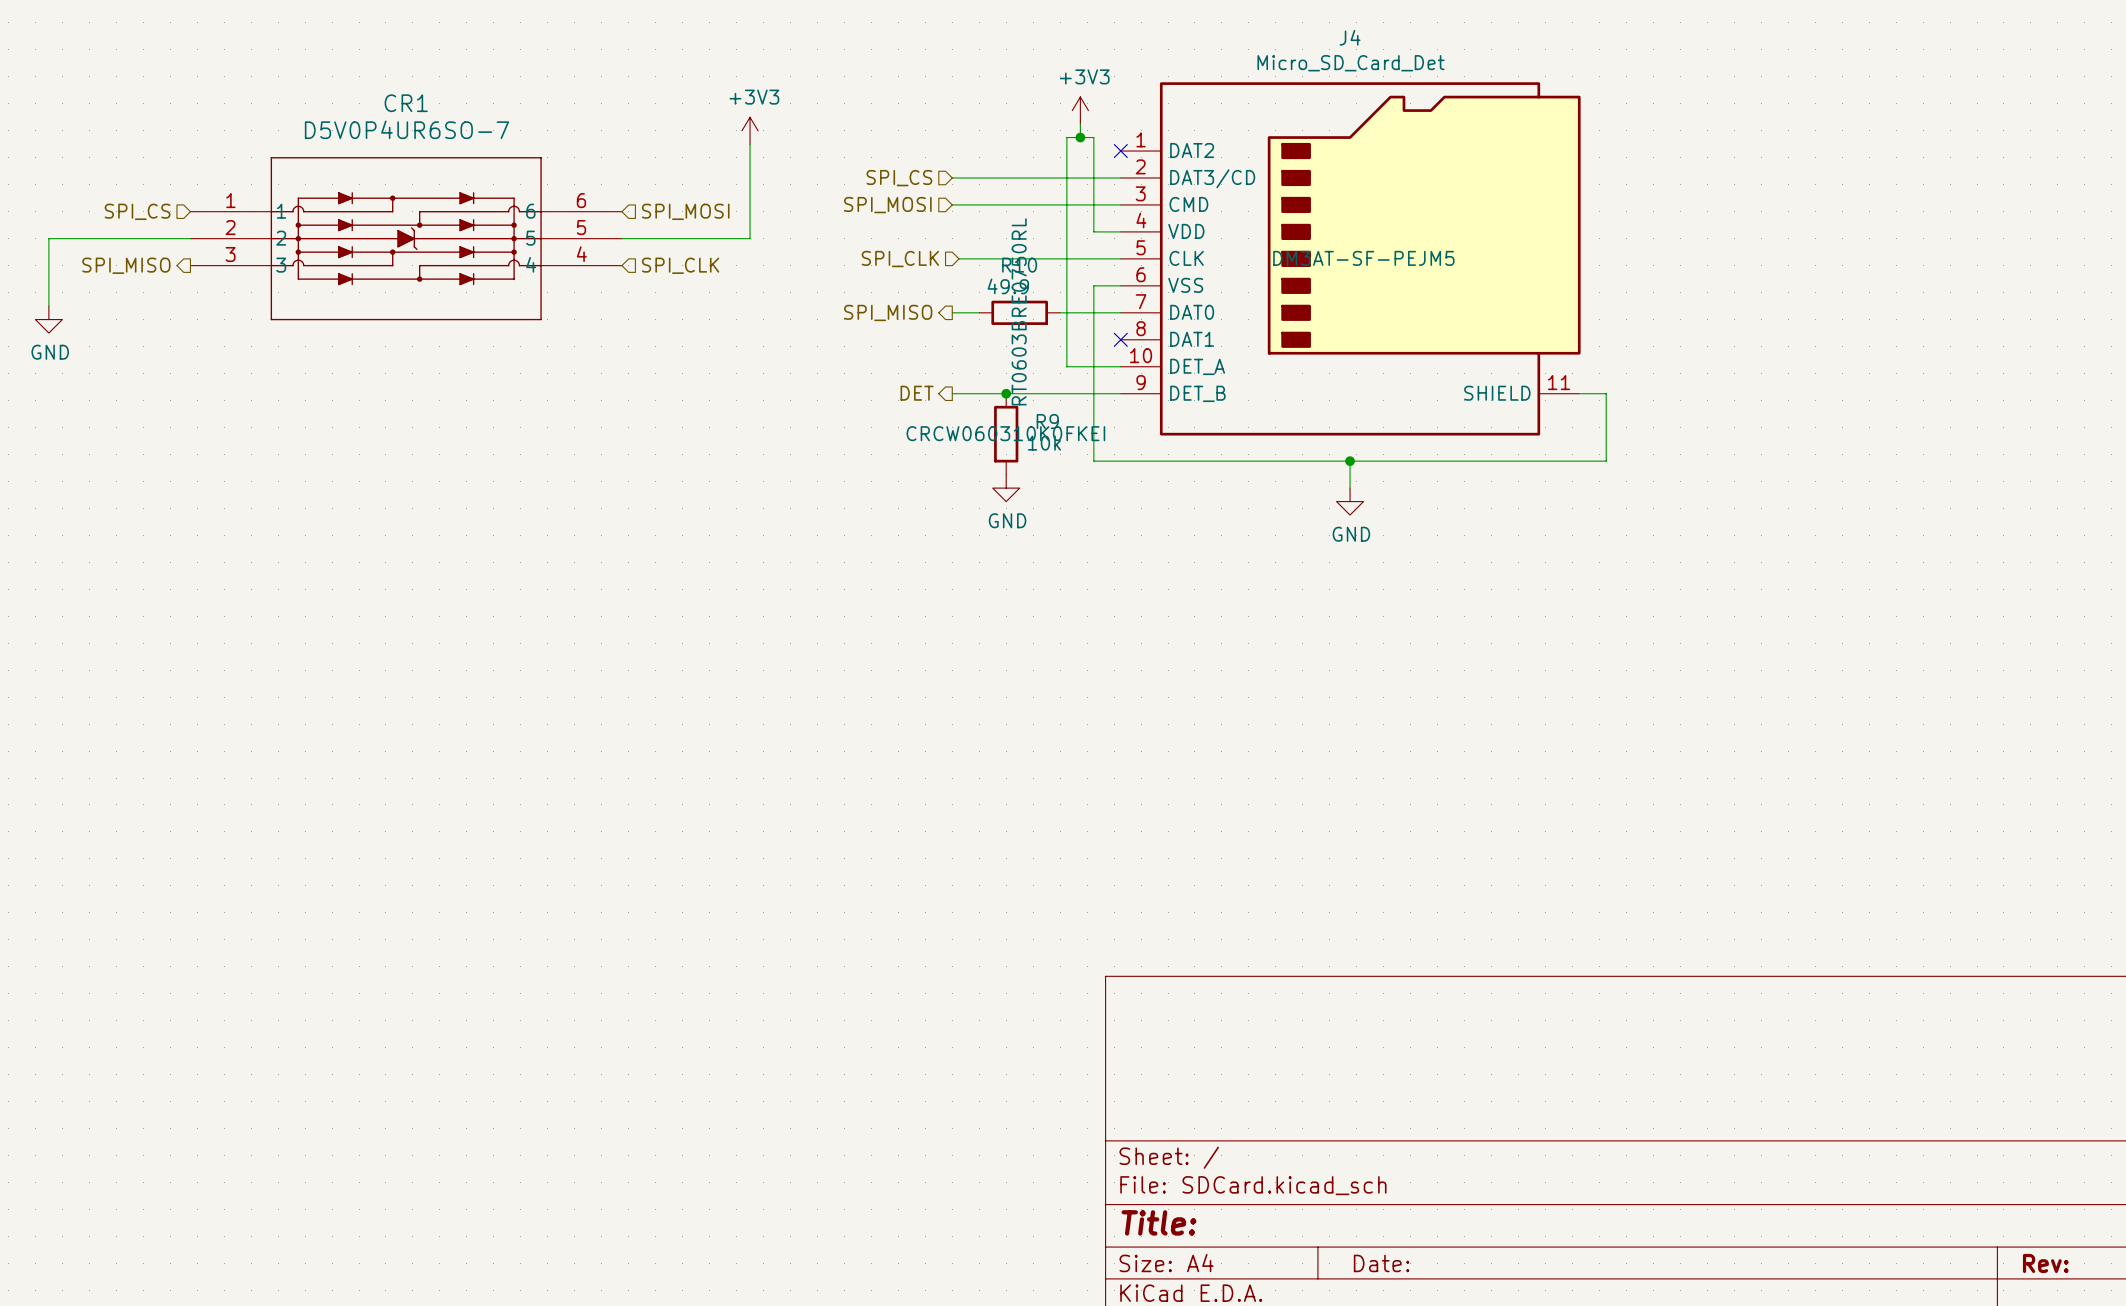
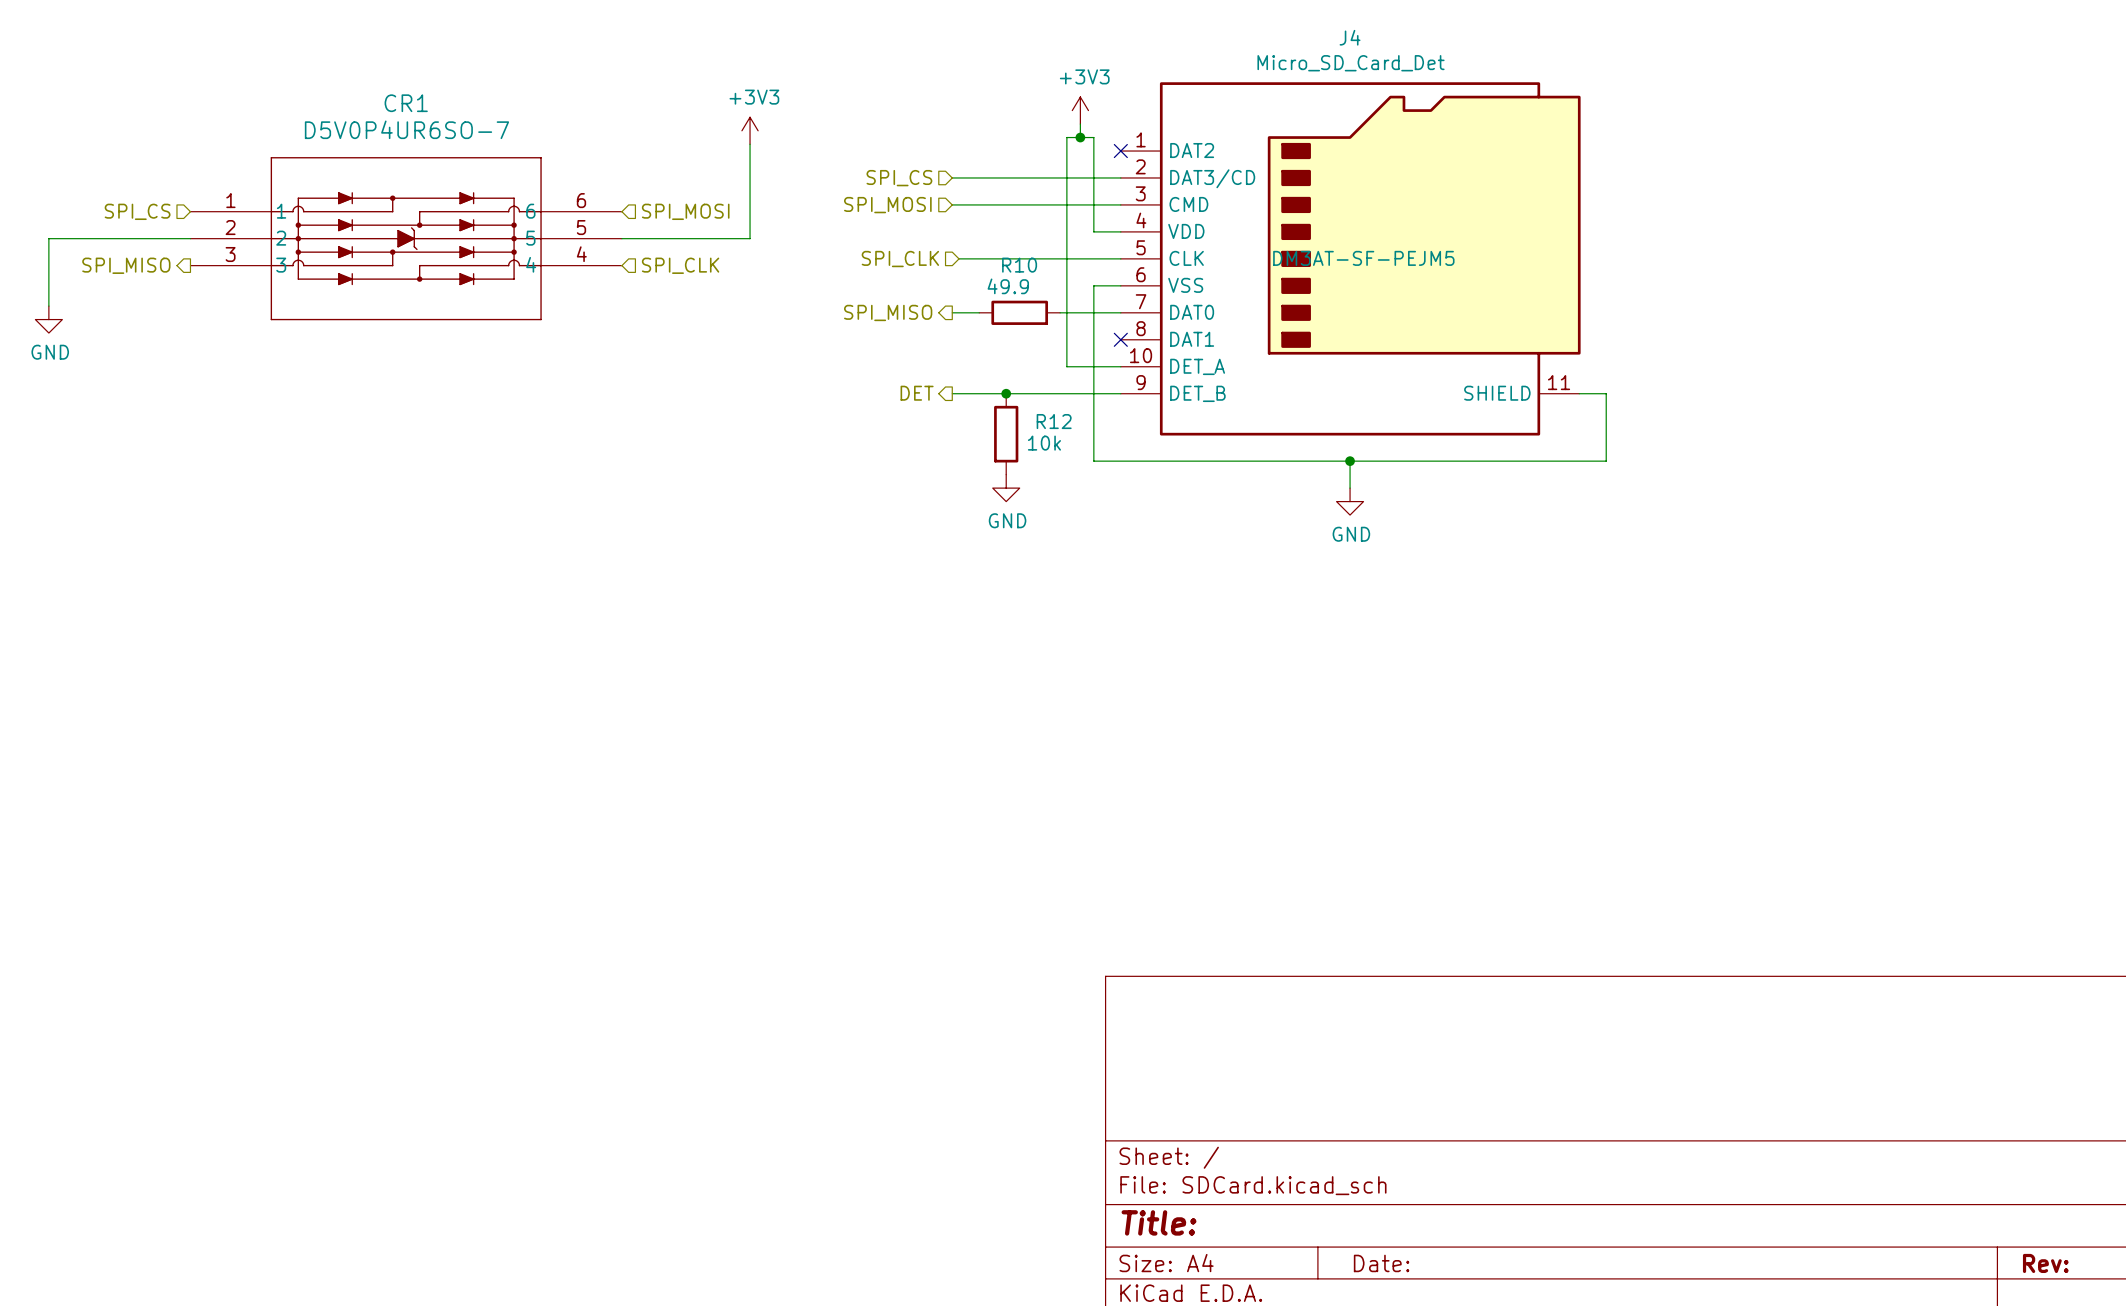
R10 text: RT0603BRE0750RL (1019, 311) -> none
R9 name: R9 (1047, 421) -> R12 (1054, 421)
R9 text: CRCW060310K0FKEI (1005, 433) -> none

